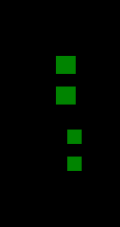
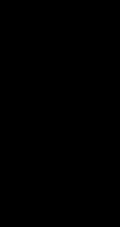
part: (65, 80) -> none
part: (74, 150) -> none

